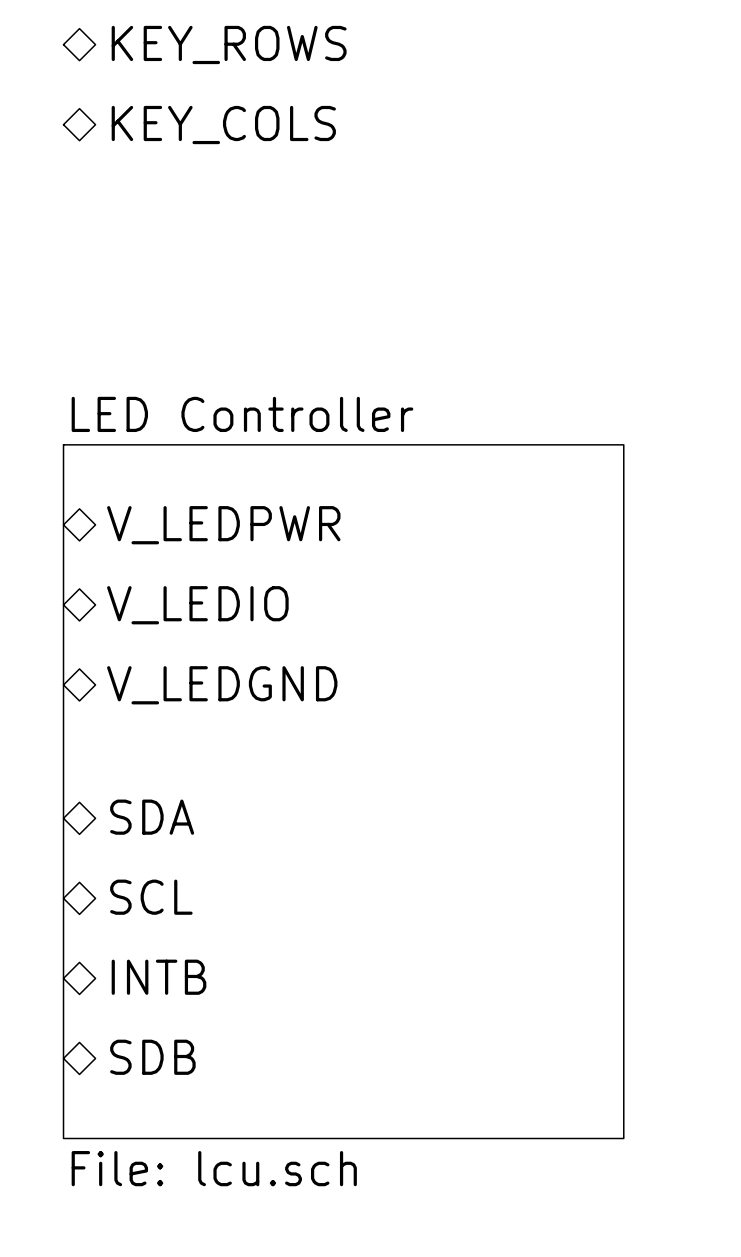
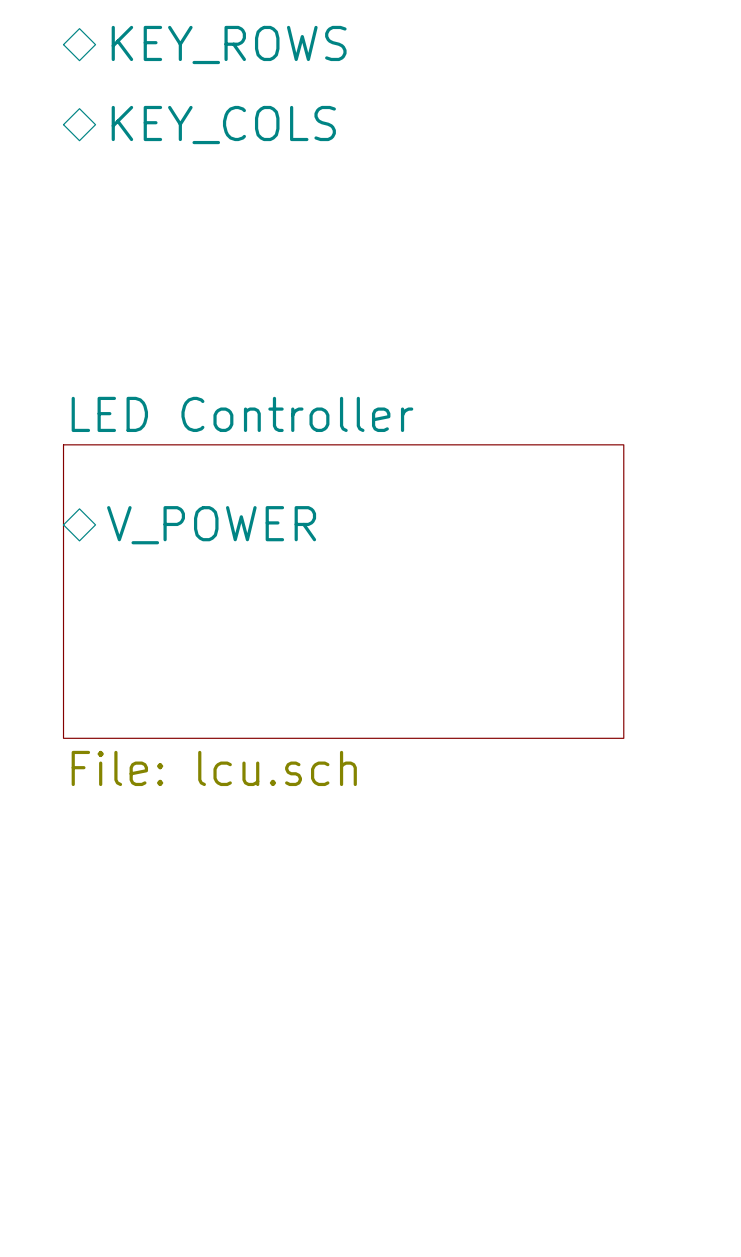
sheet pin: V_LEDPWR (223, 525) -> V_POWER (211, 525)
sheet LED Controller: none -> File: lcu.sch (343, 591)
sheet pin: V_LEDIO (197, 605) -> none
sheet pin: V_LEDGND (222, 685) -> none
sheet LED Controller: File: lcu.sch (343, 791) -> none
sheet pin: SDA (152, 817) -> none
sheet pin: SCL (151, 897) -> none
sheet pin: INTB (158, 977) -> none
sheet pin: SDB (152, 1057) -> none

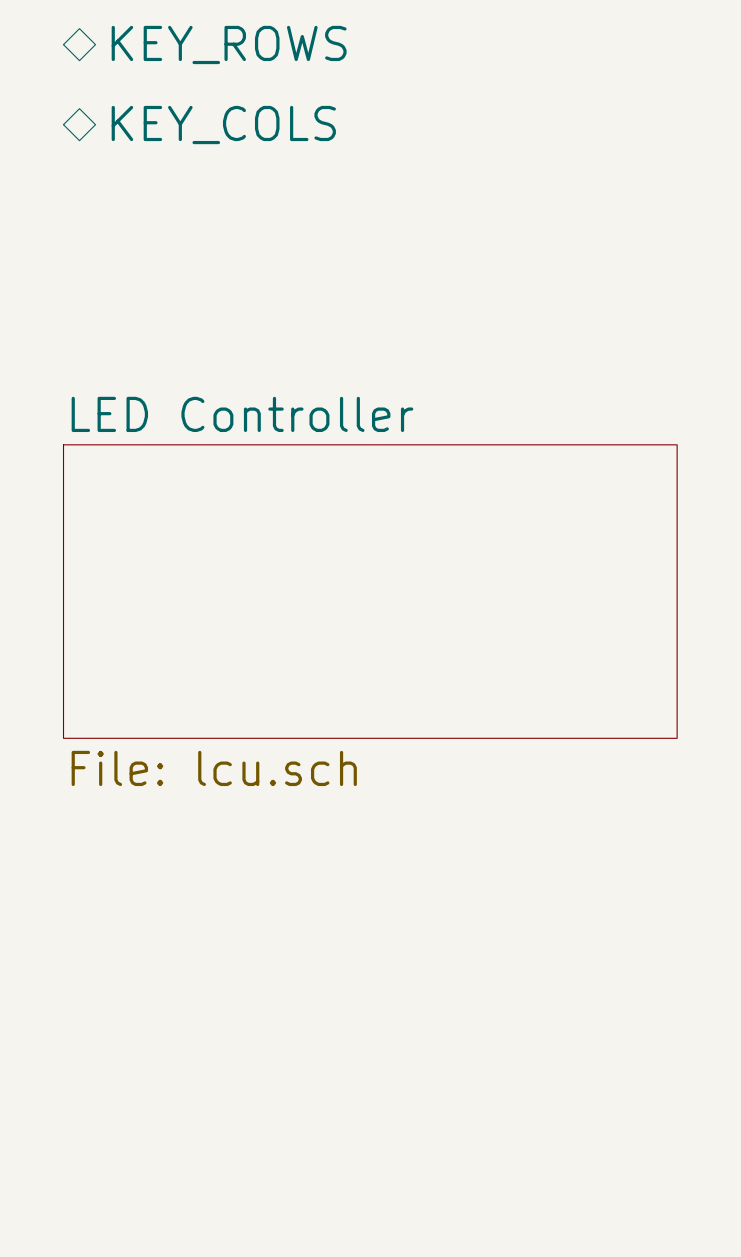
sheet pin: V_POWER (211, 525) -> none
sheet LED Controller: File: lcu.sch (343, 591) -> none
sheet LED Controller: none -> File: lcu.sch (370, 591)

